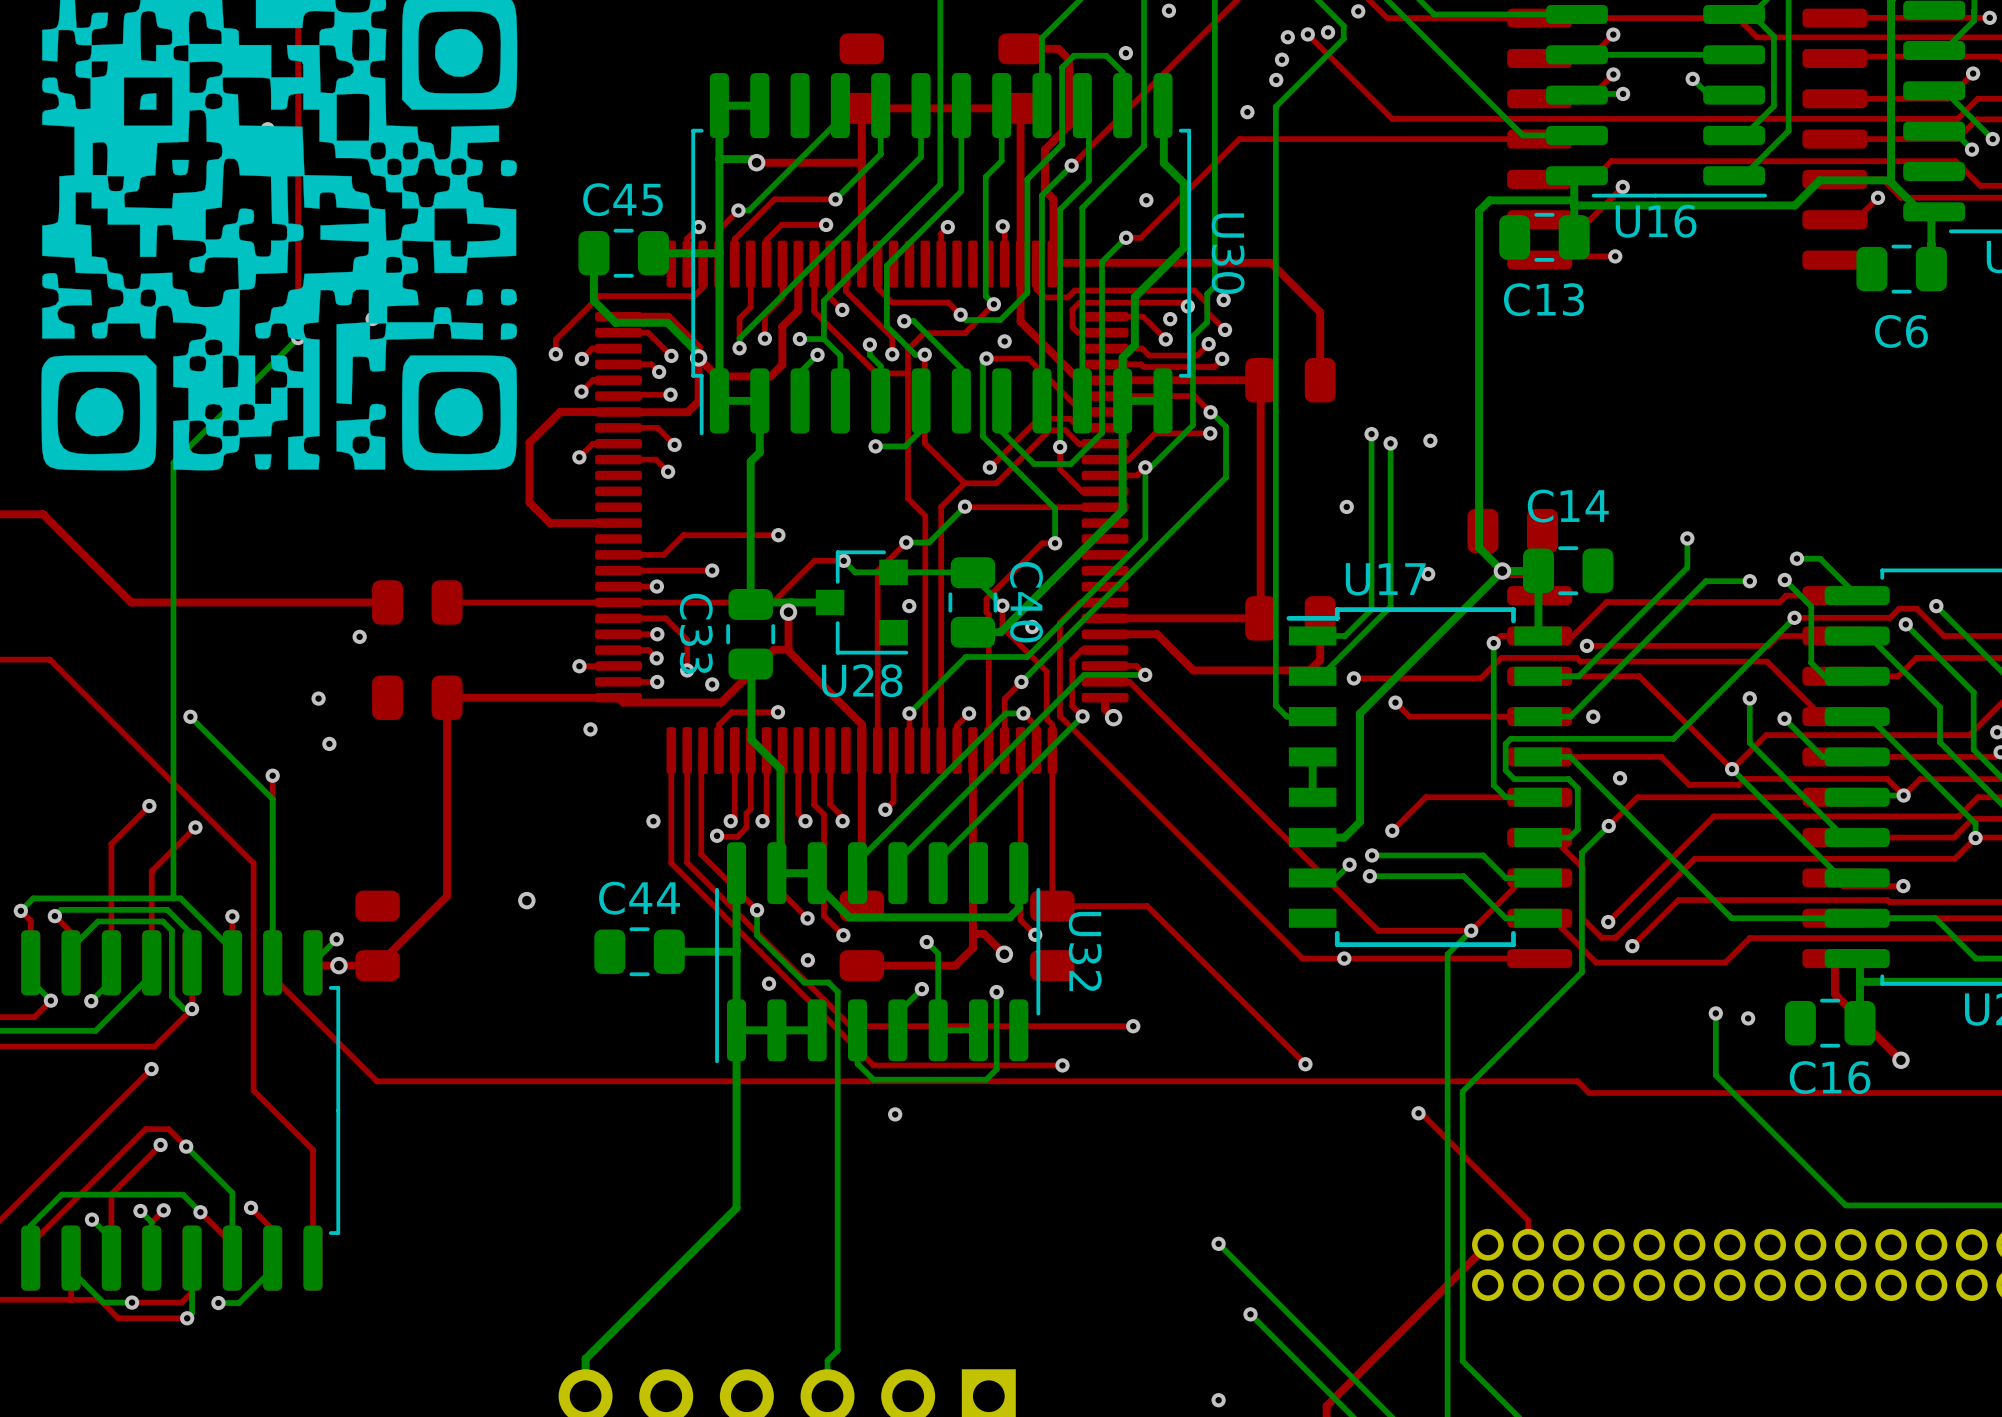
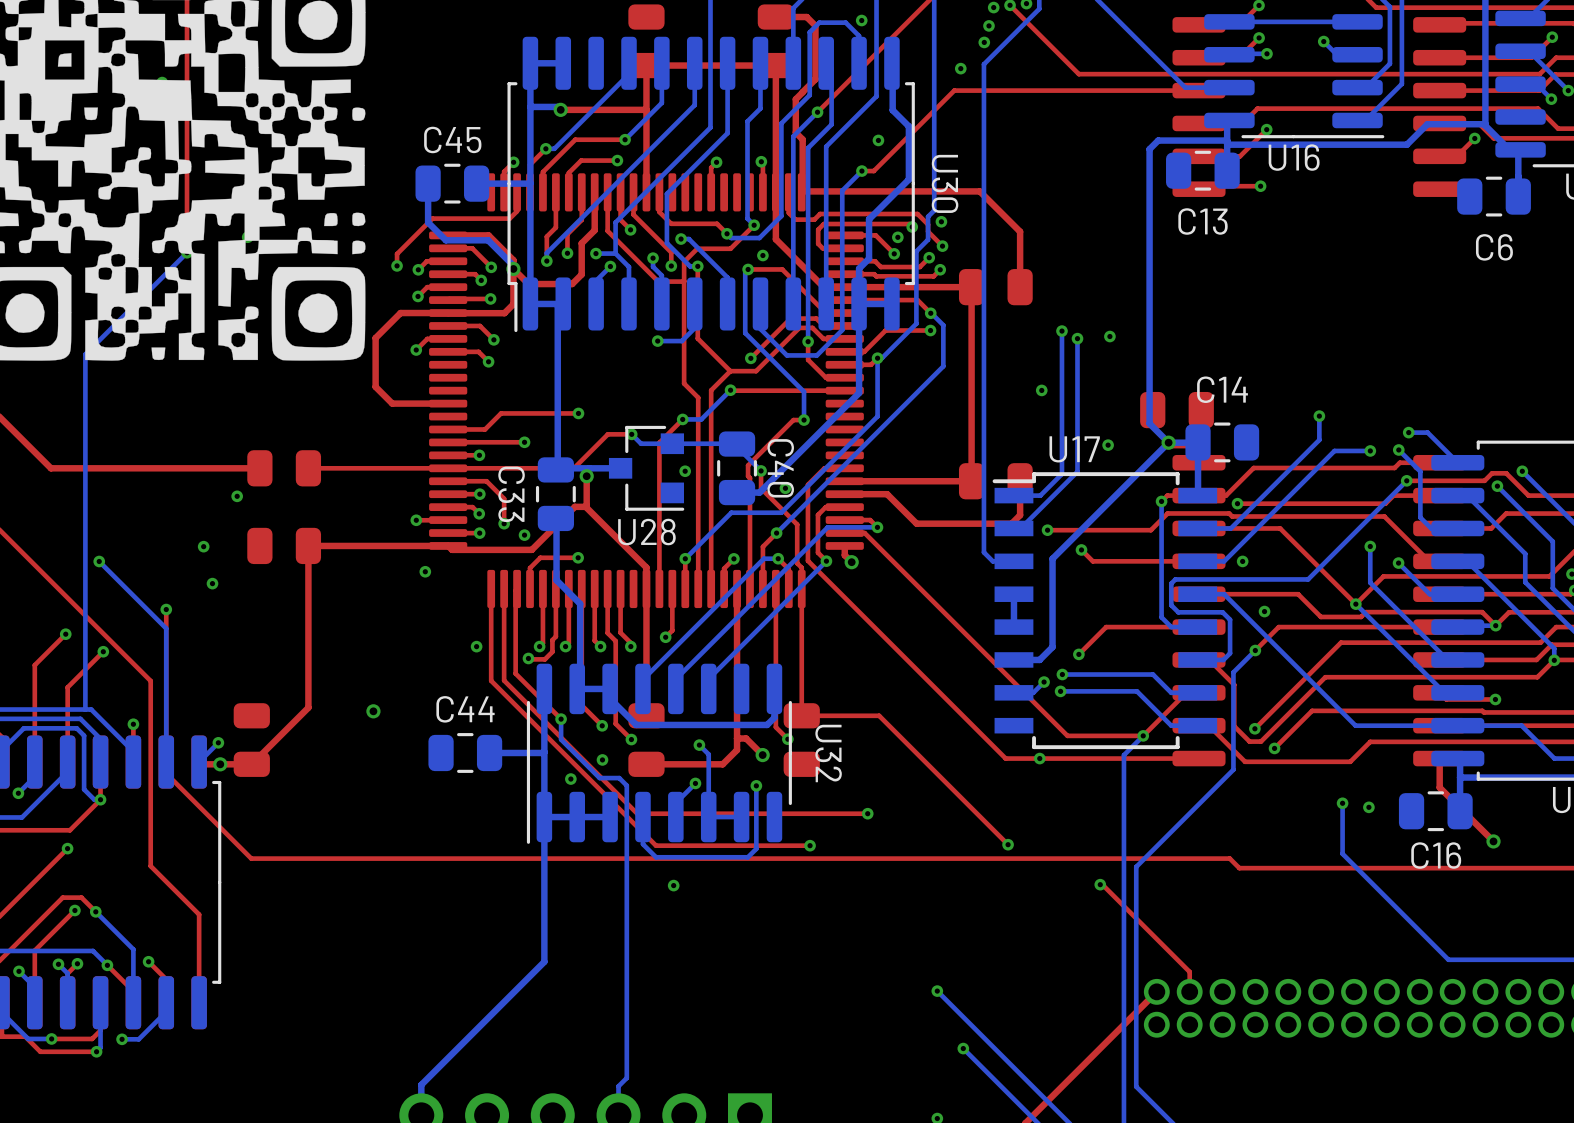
bottom track: none -> (557, 303) (557, 468)
bottom track: (759, 400) (759, 452) (750, 461) (750, 604) -> none

